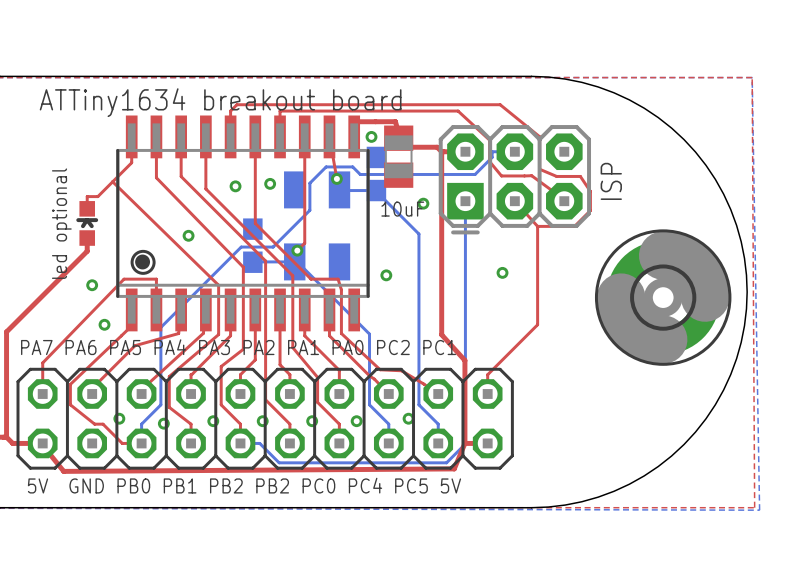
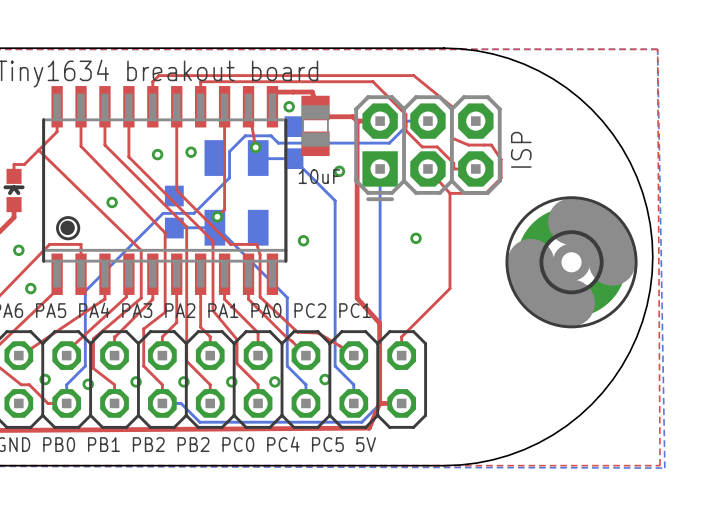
top track: (458, 111) (489, 140) (489, 161) (501, 175) (531, 175) (564, 201) -> (372, 81) (405, 114) (405, 130) (422, 146) (437, 146) (453, 163) (453, 168) (475, 168)
top track: (181, 309) (178, 333) (135, 345) (99, 381) (92, 394) -> (104, 274) (104, 299) (18, 355)

